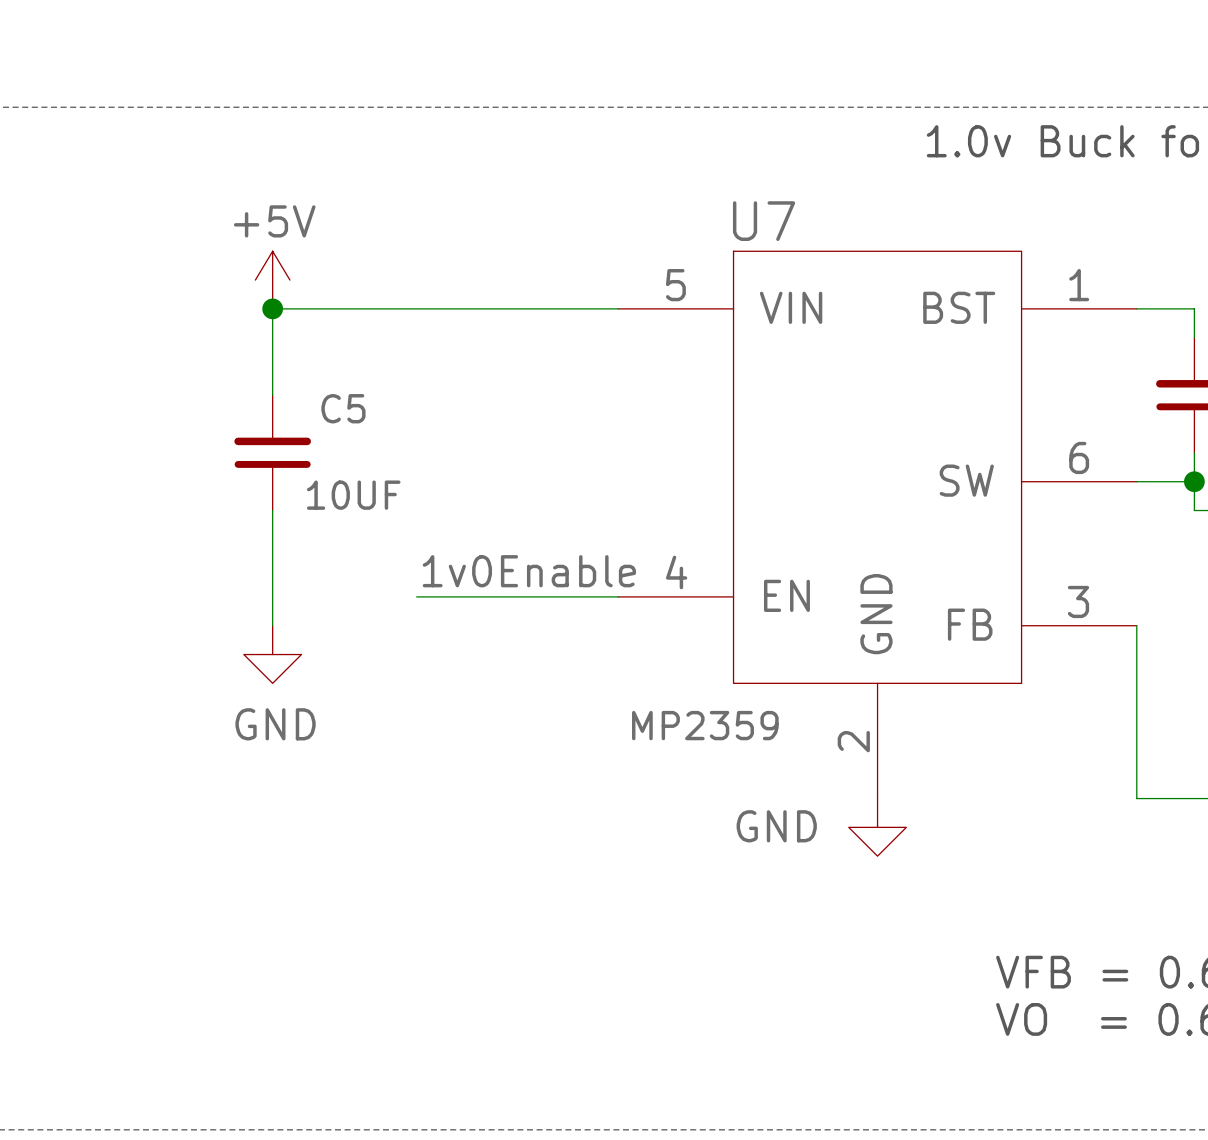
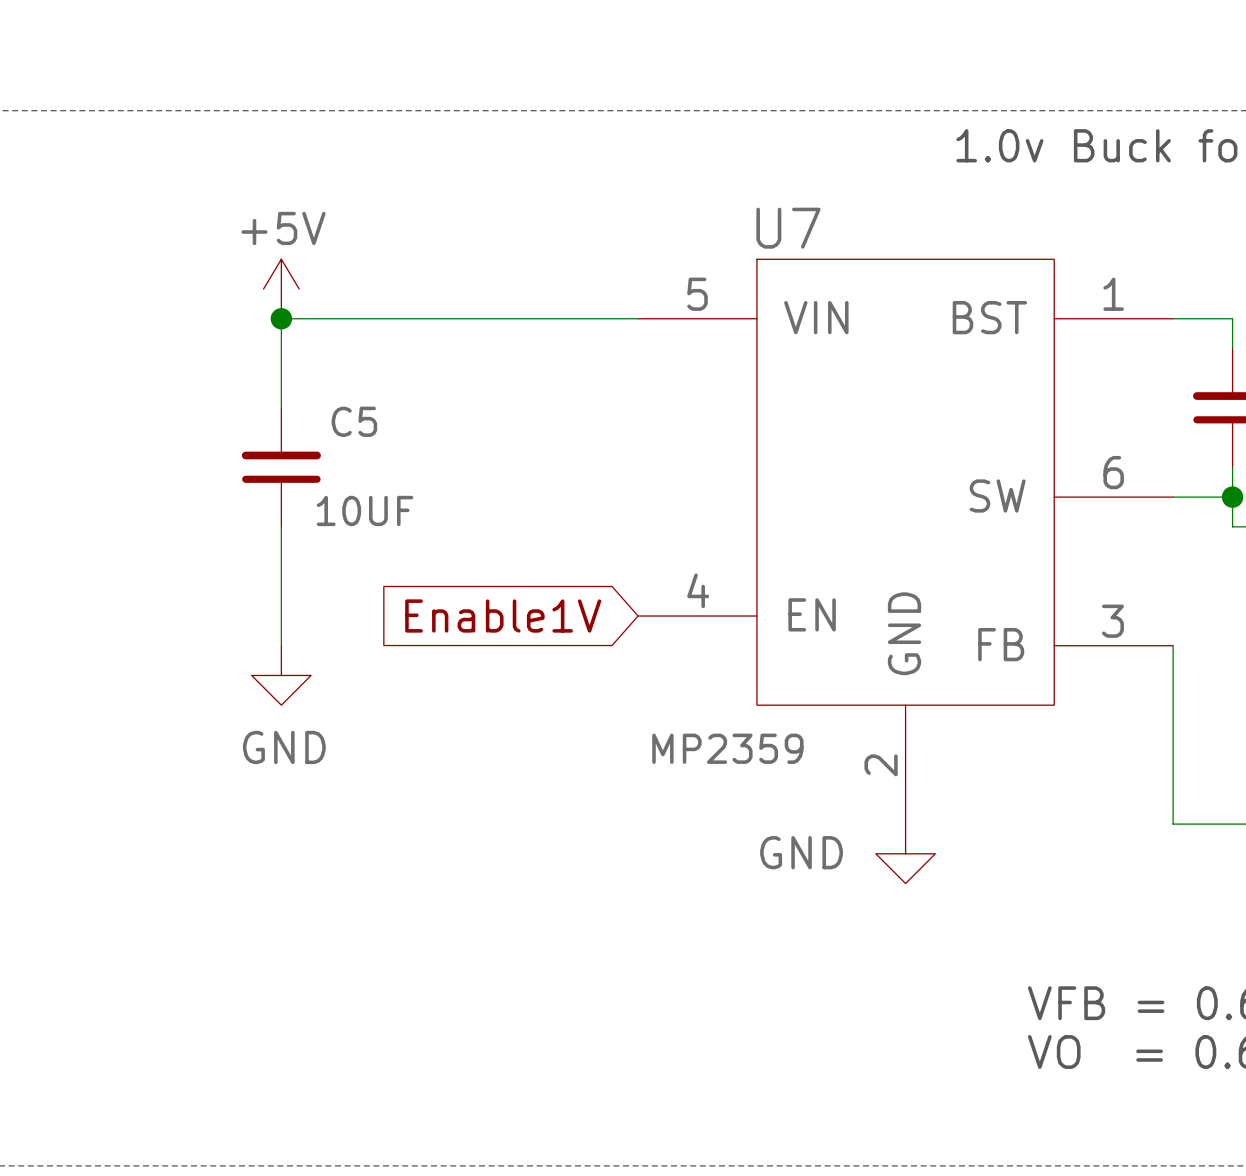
label: 1v0Enable (529, 571) -> none
wire: (416, 596) (618, 596) -> none
global label: none -> Enable1V (503, 616)

